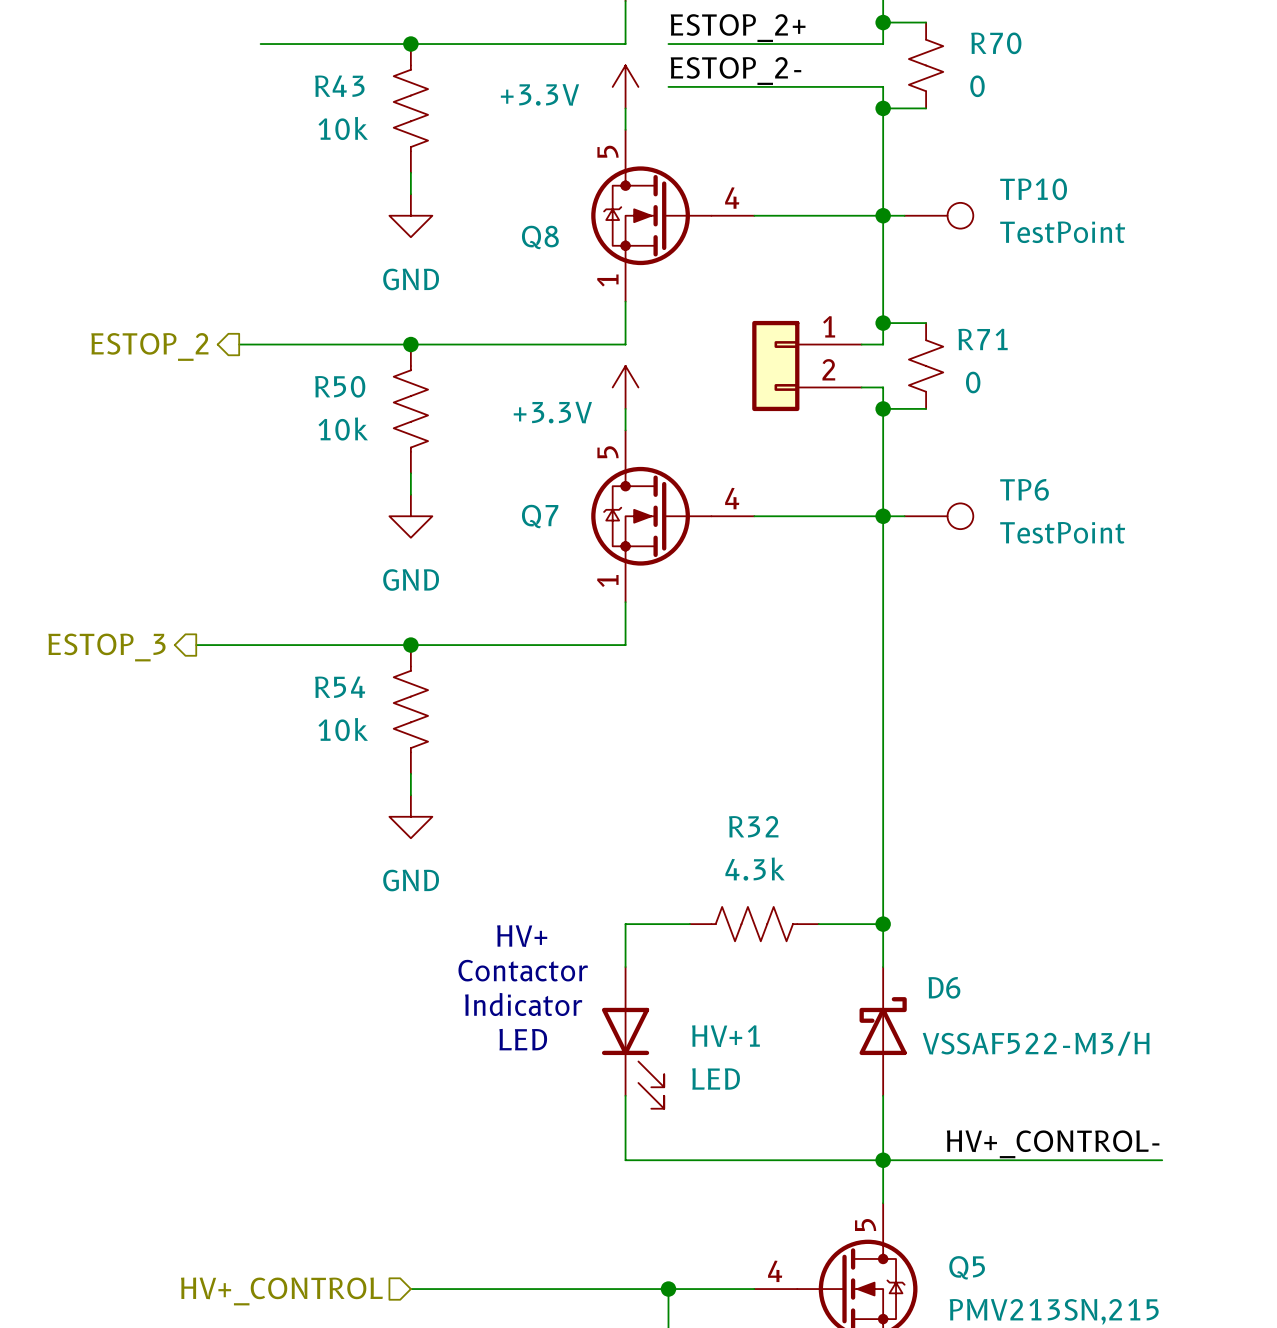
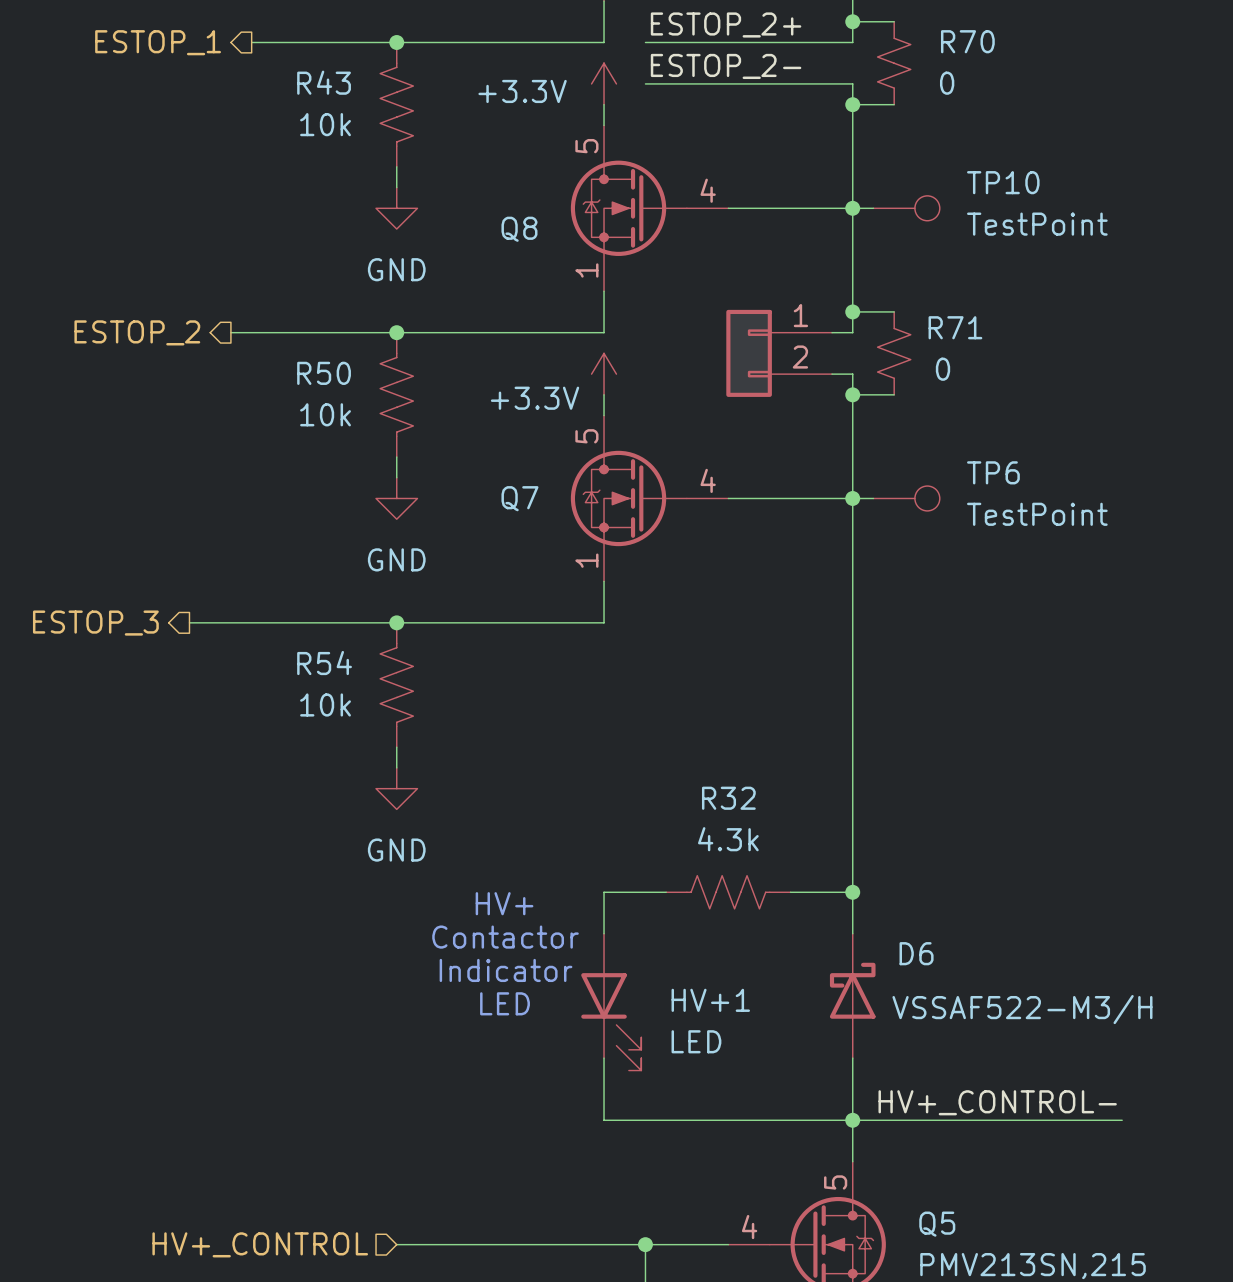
hierarchical label: none -> ESTOP_1 (158, 42)

